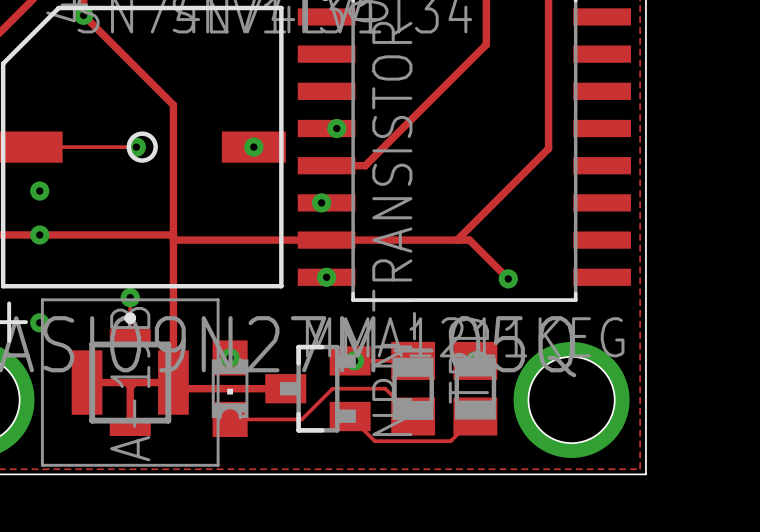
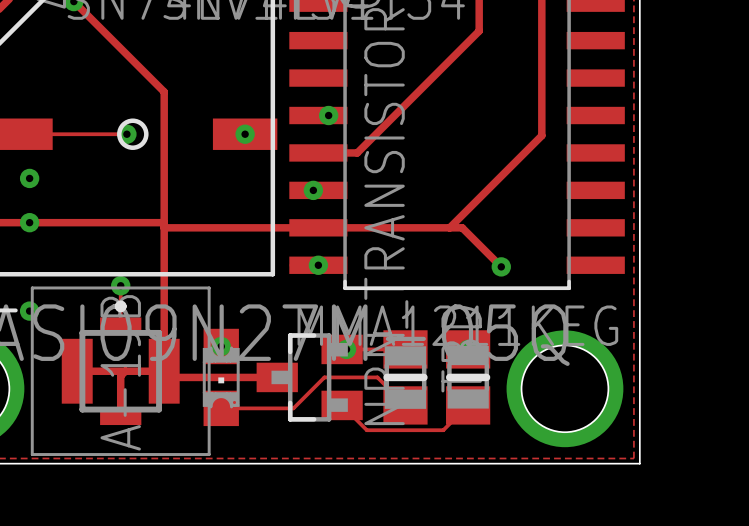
line: none -> (387, 377) (423, 377)
line: none -> (449, 377) (486, 377)

